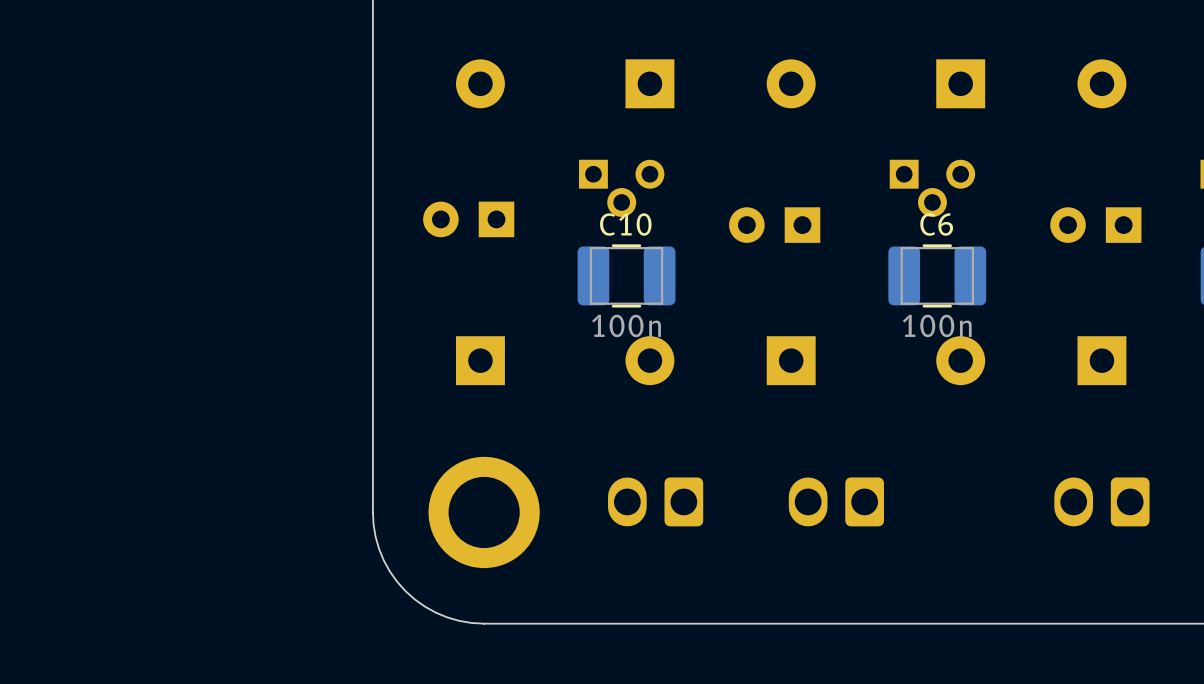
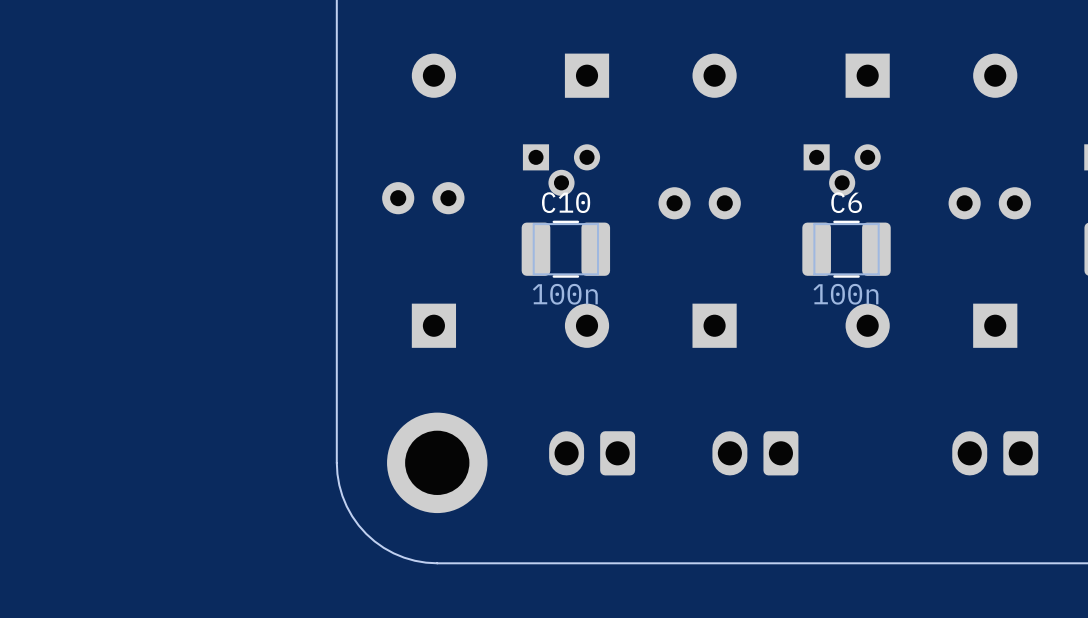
part footprint: [423, 201, 515, 238] -> [382, 182, 465, 215]
part footprint: [729, 207, 821, 243] -> [658, 187, 741, 220]
part footprint: [1050, 207, 1142, 243] -> [948, 187, 1031, 220]

